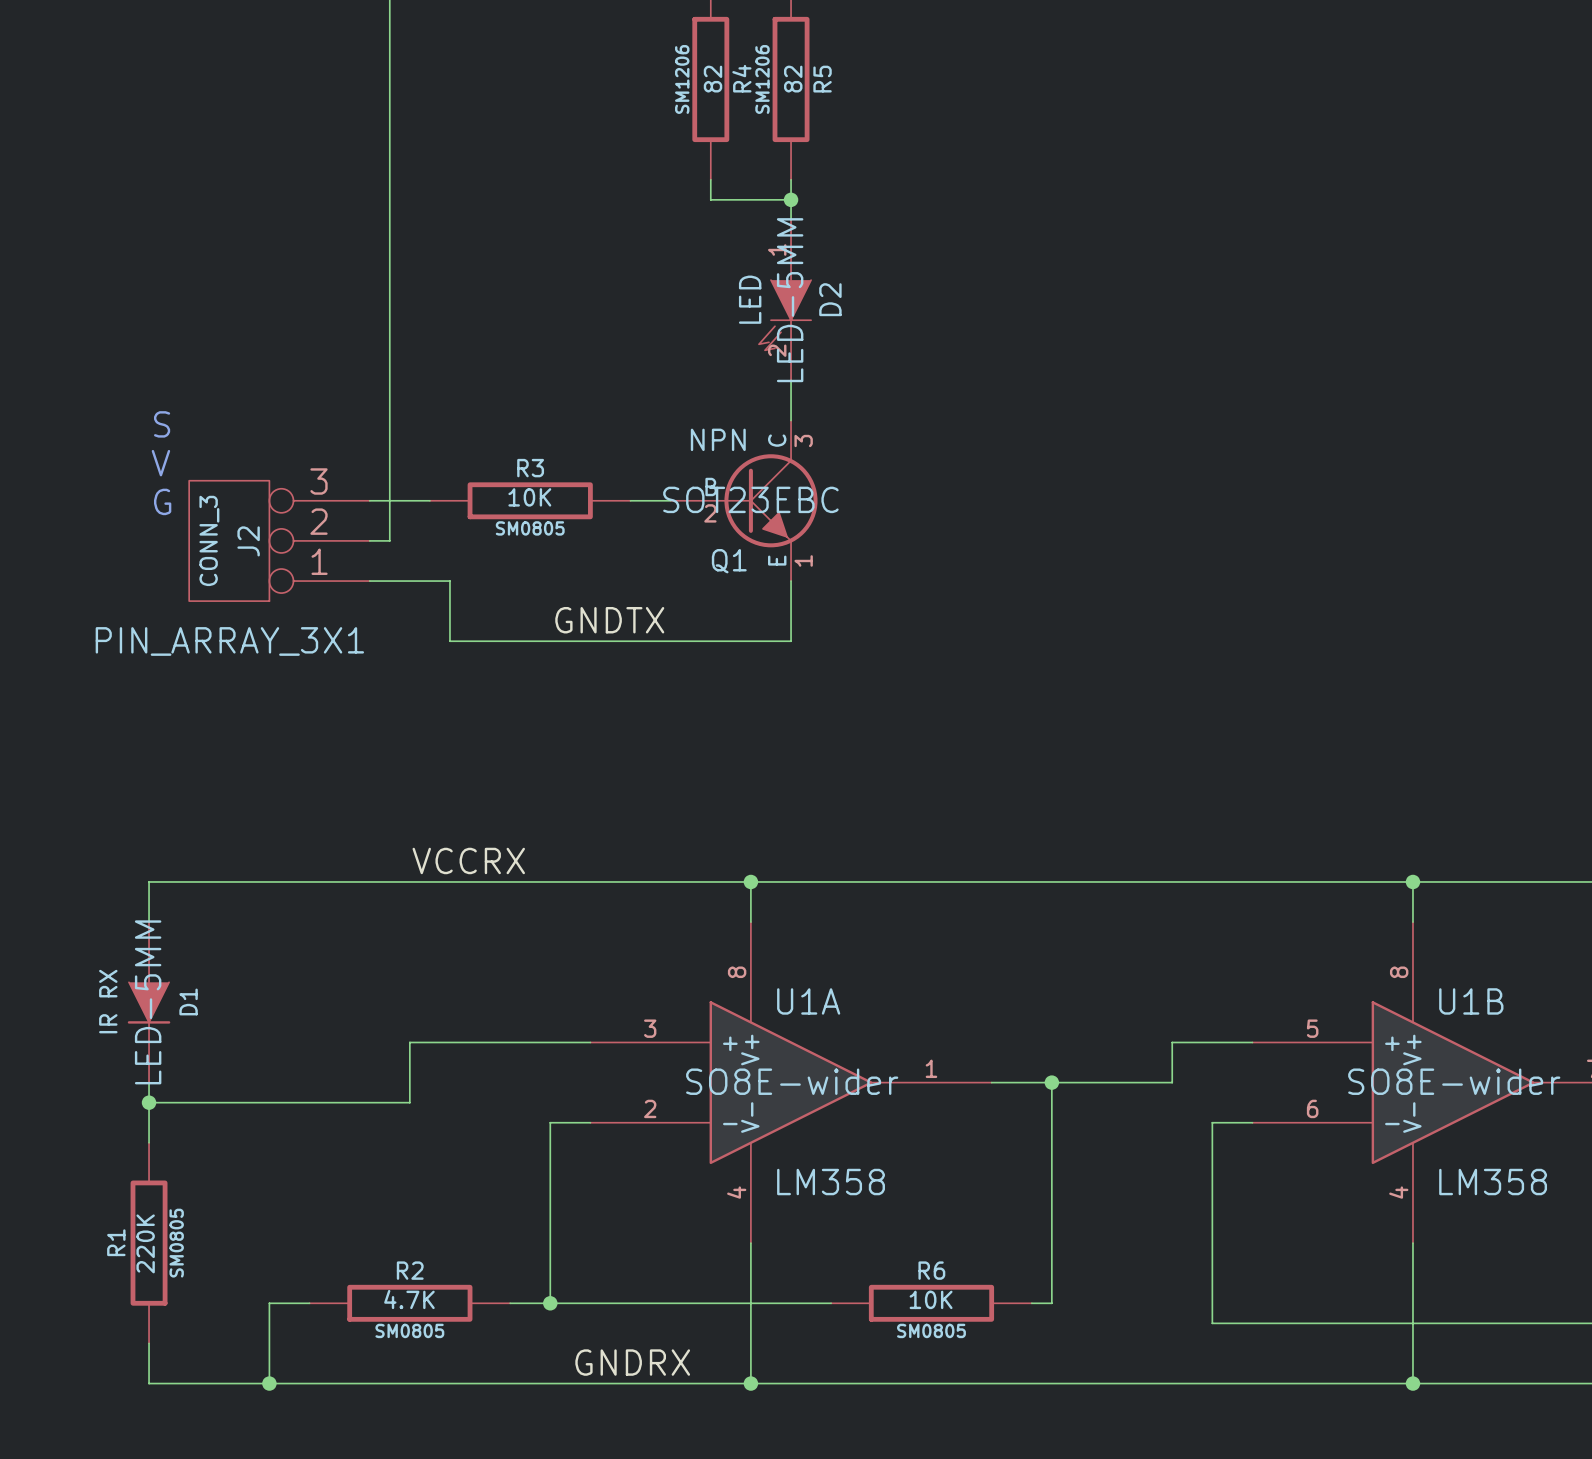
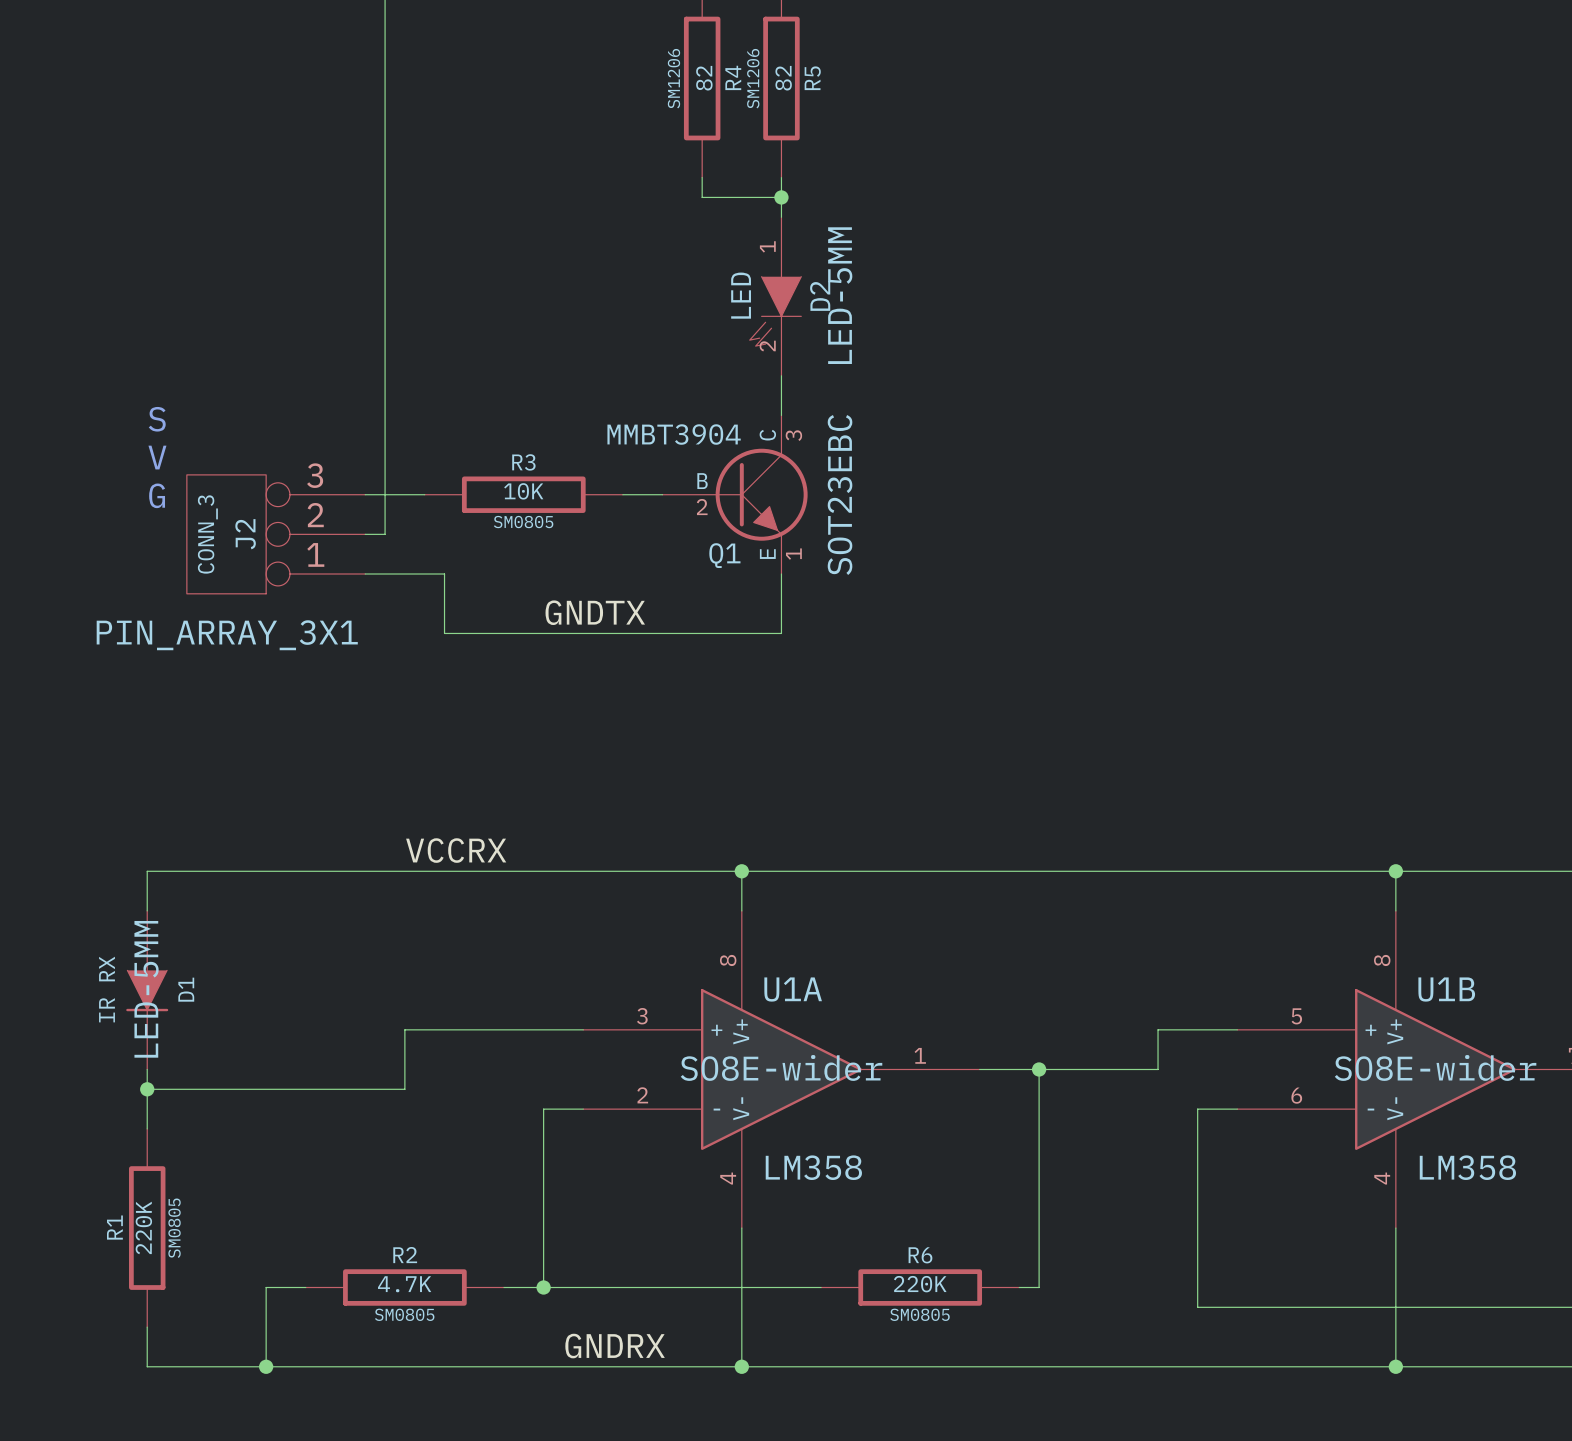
D2 text position: LED-5MM (790, 300) -> LED-5MM (840, 295)
Q1 value: NPN (718, 439) -> MMBT3904 (674, 434)
Q1 text rotation: 0° (750, 499) -> 90° counterclockwise (840, 495)
R6 value: 10K (931, 1299) -> 220K (920, 1284)

